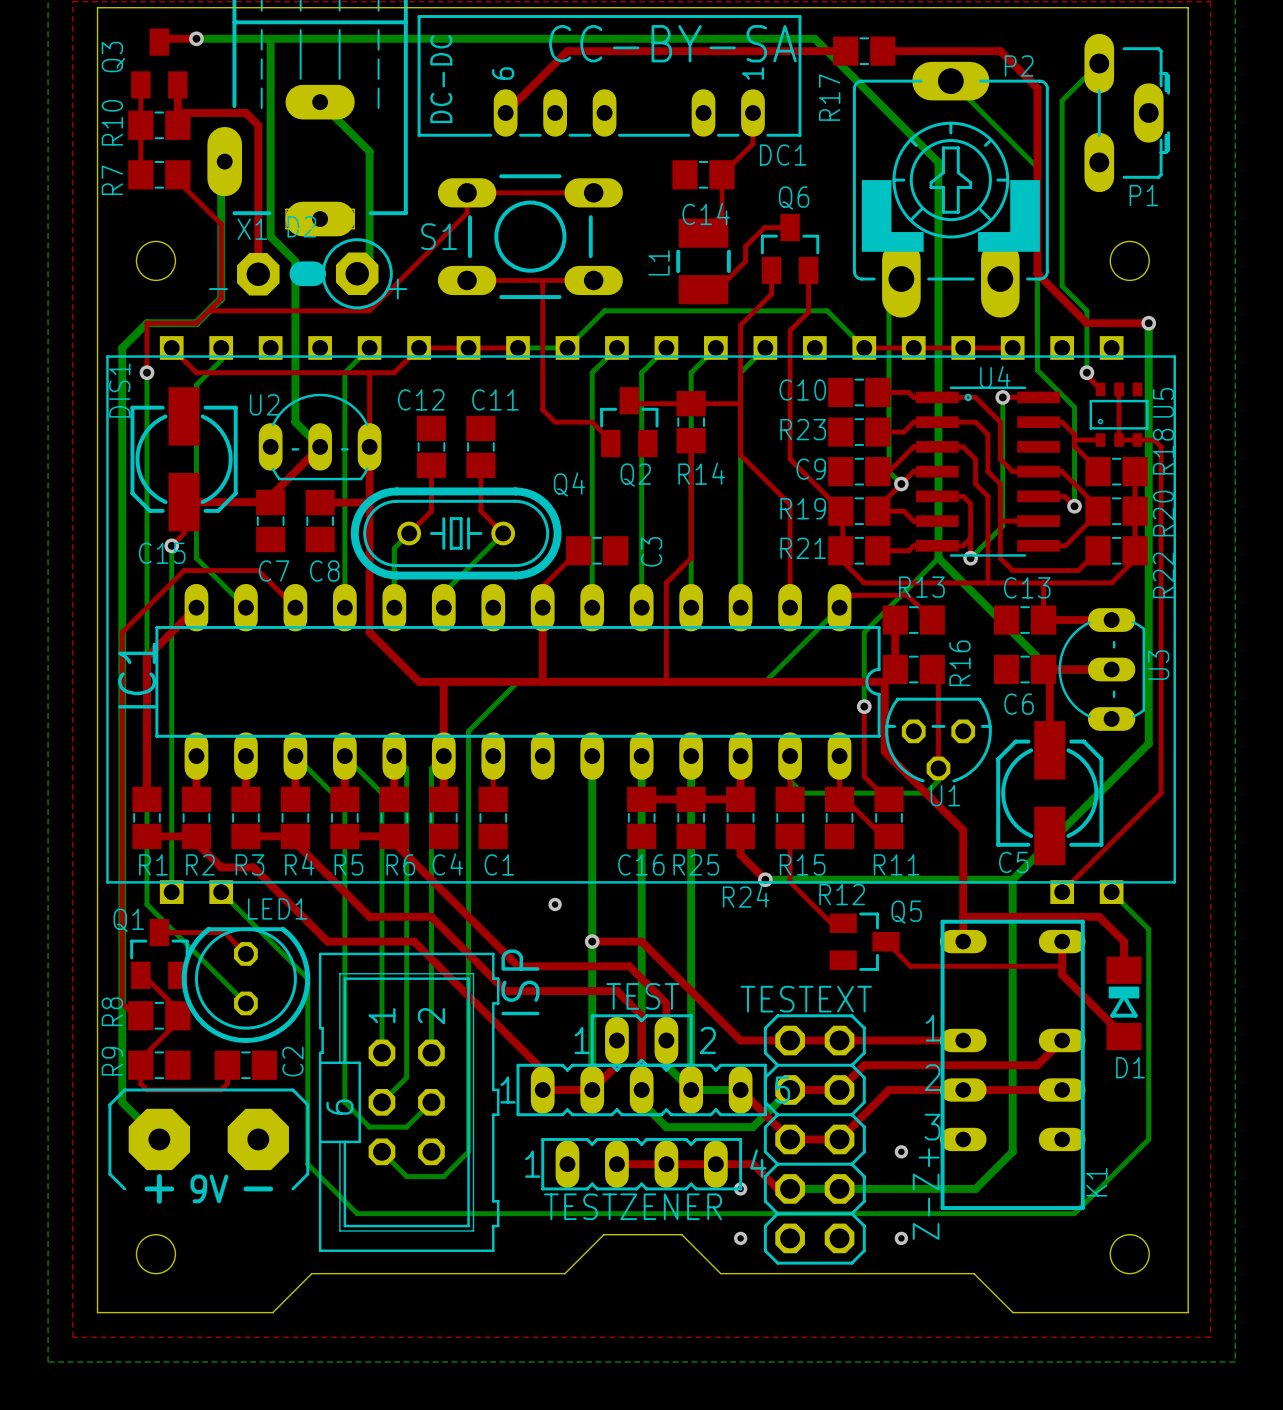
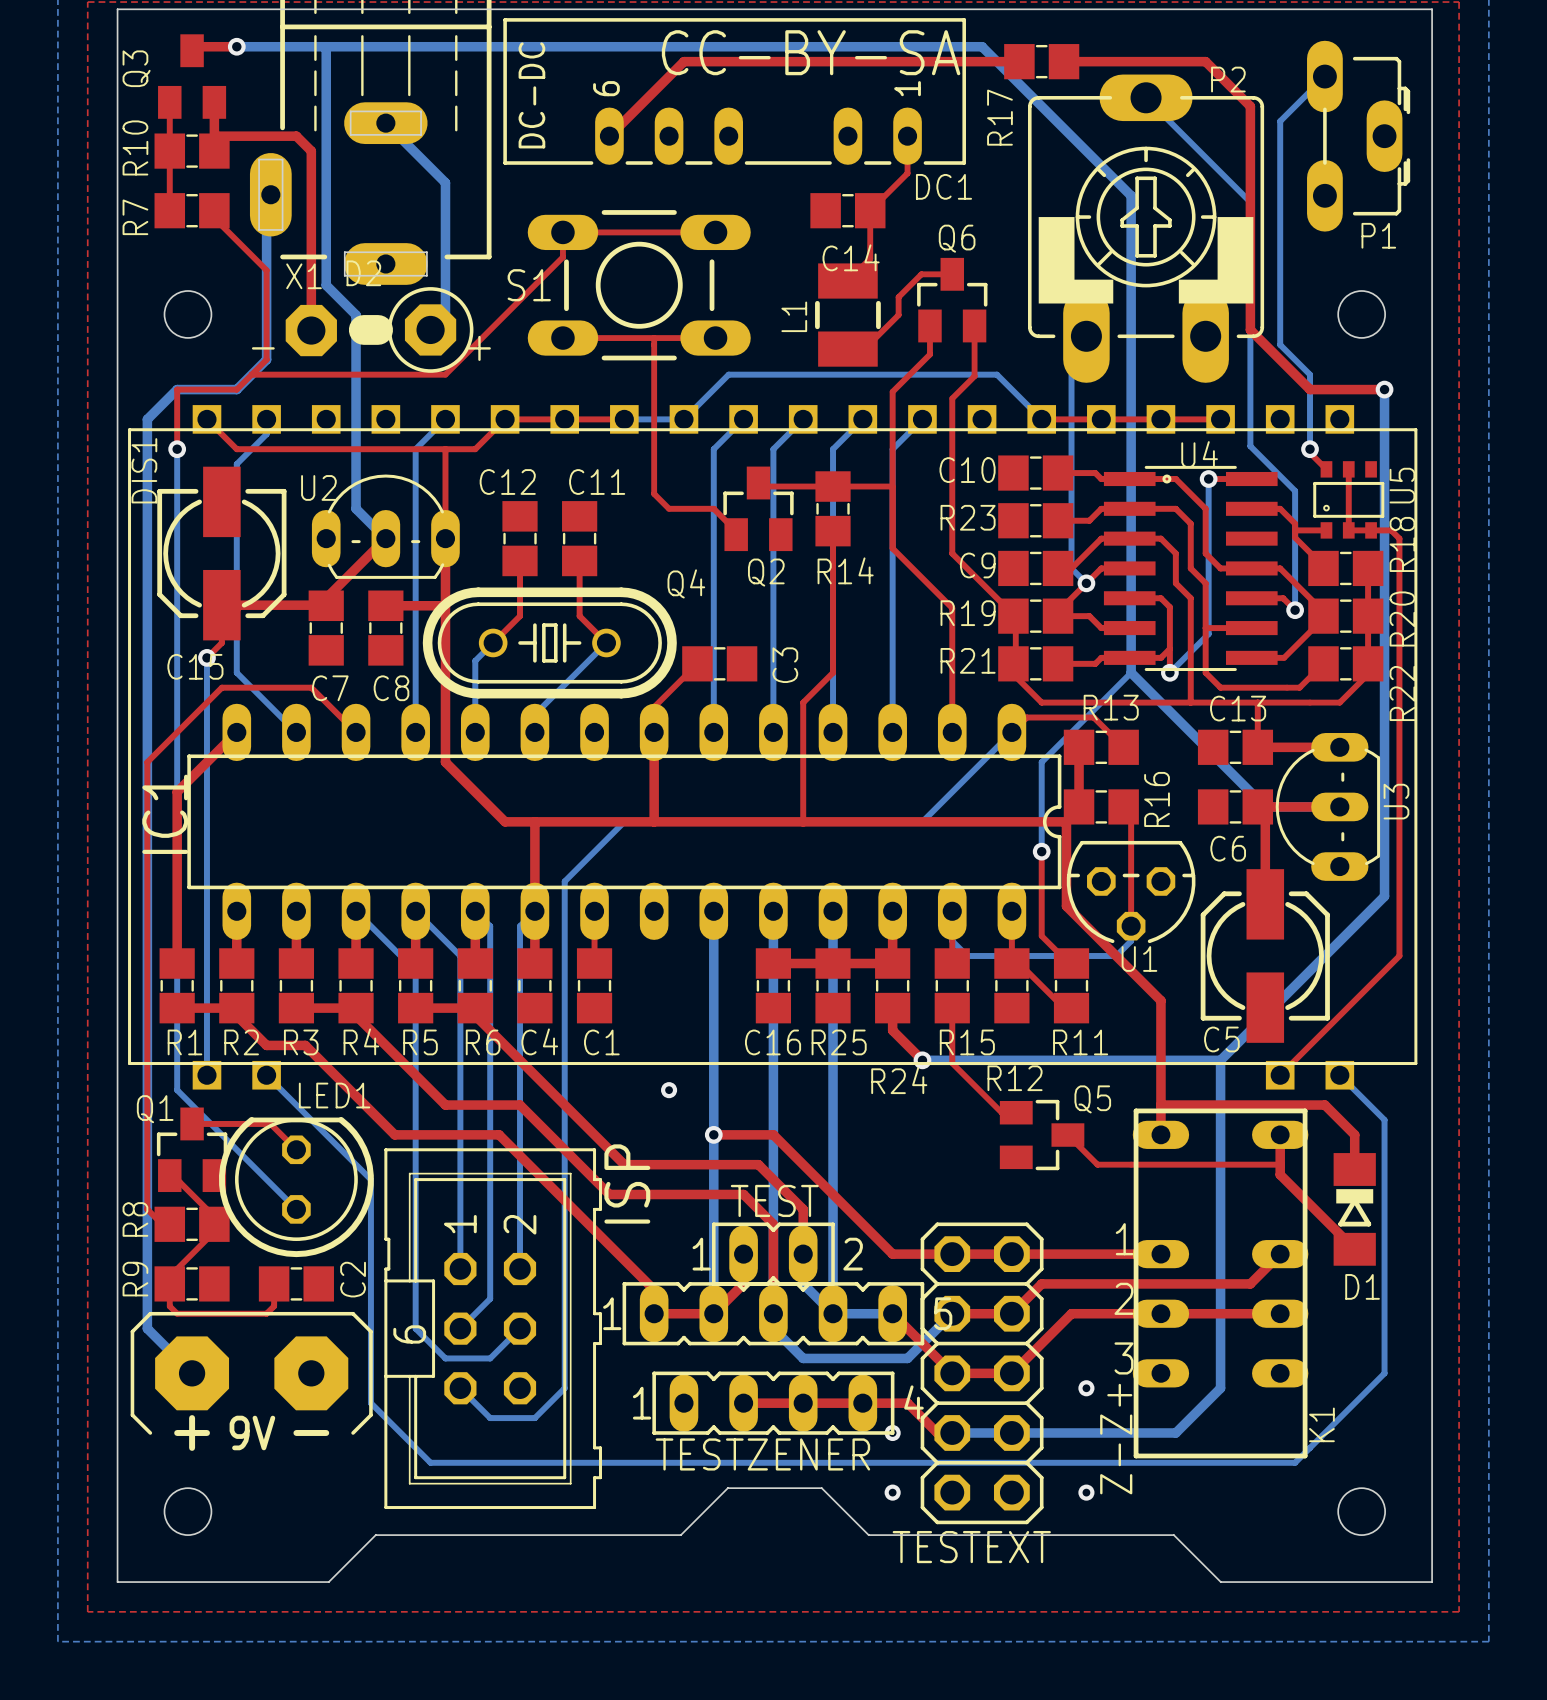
part value position: TESTEXT (806, 999) -> TESTEXT (971, 1547)

